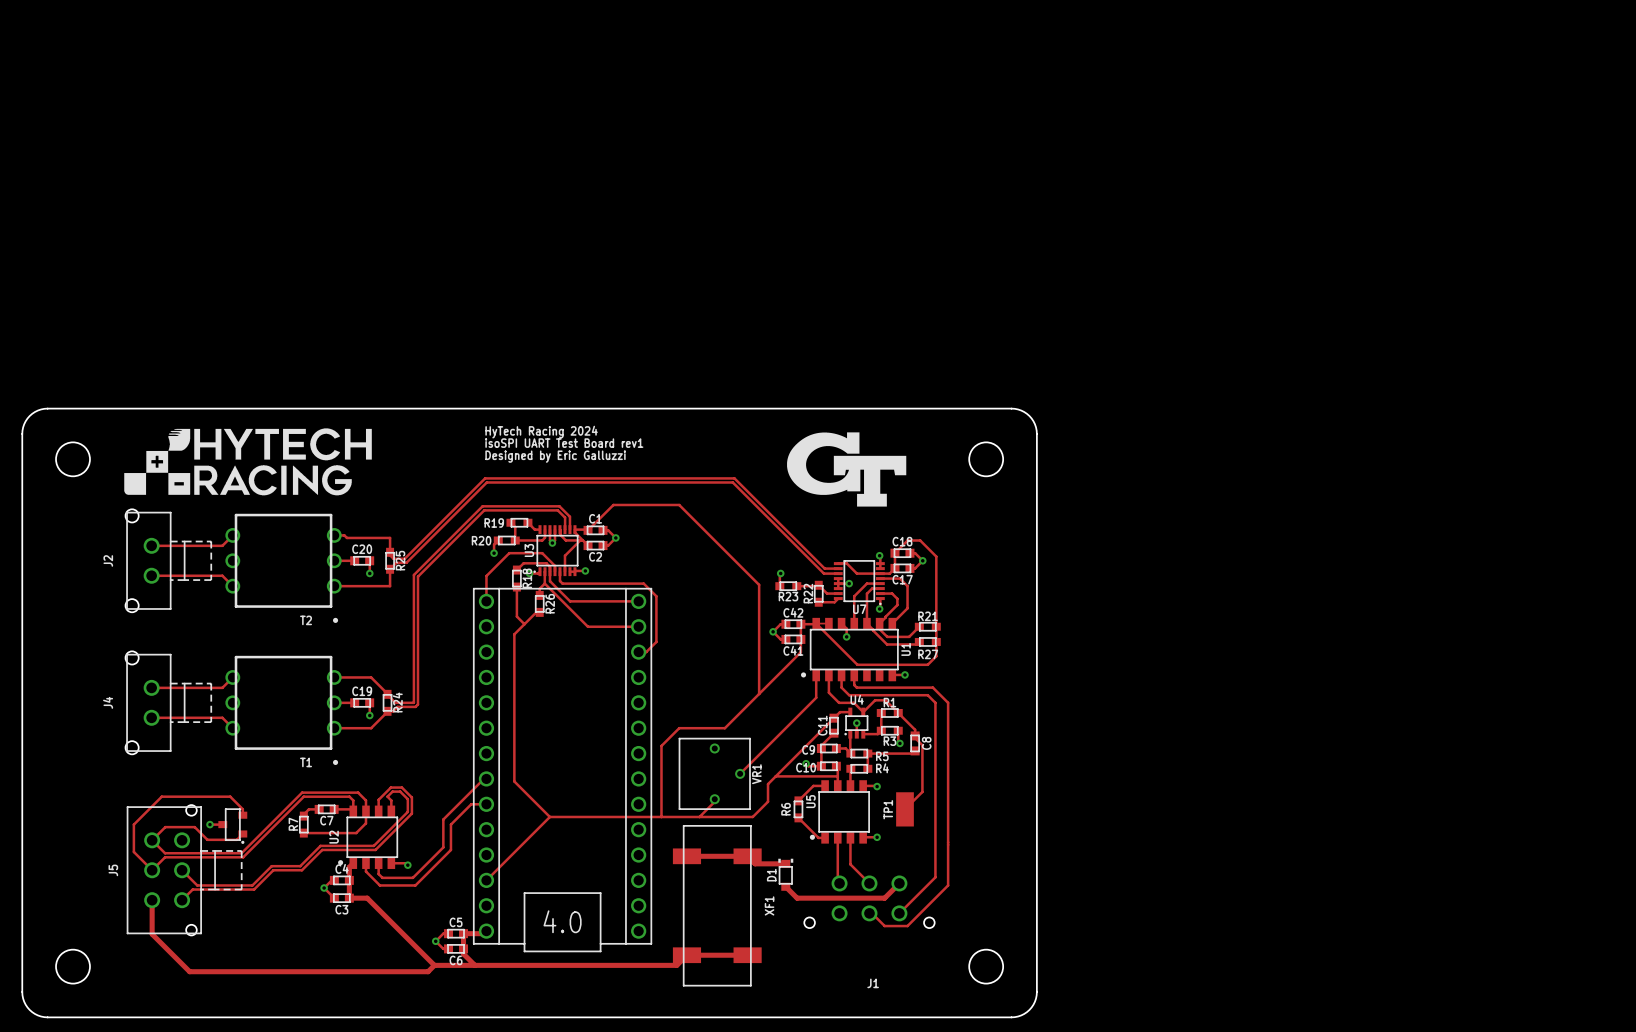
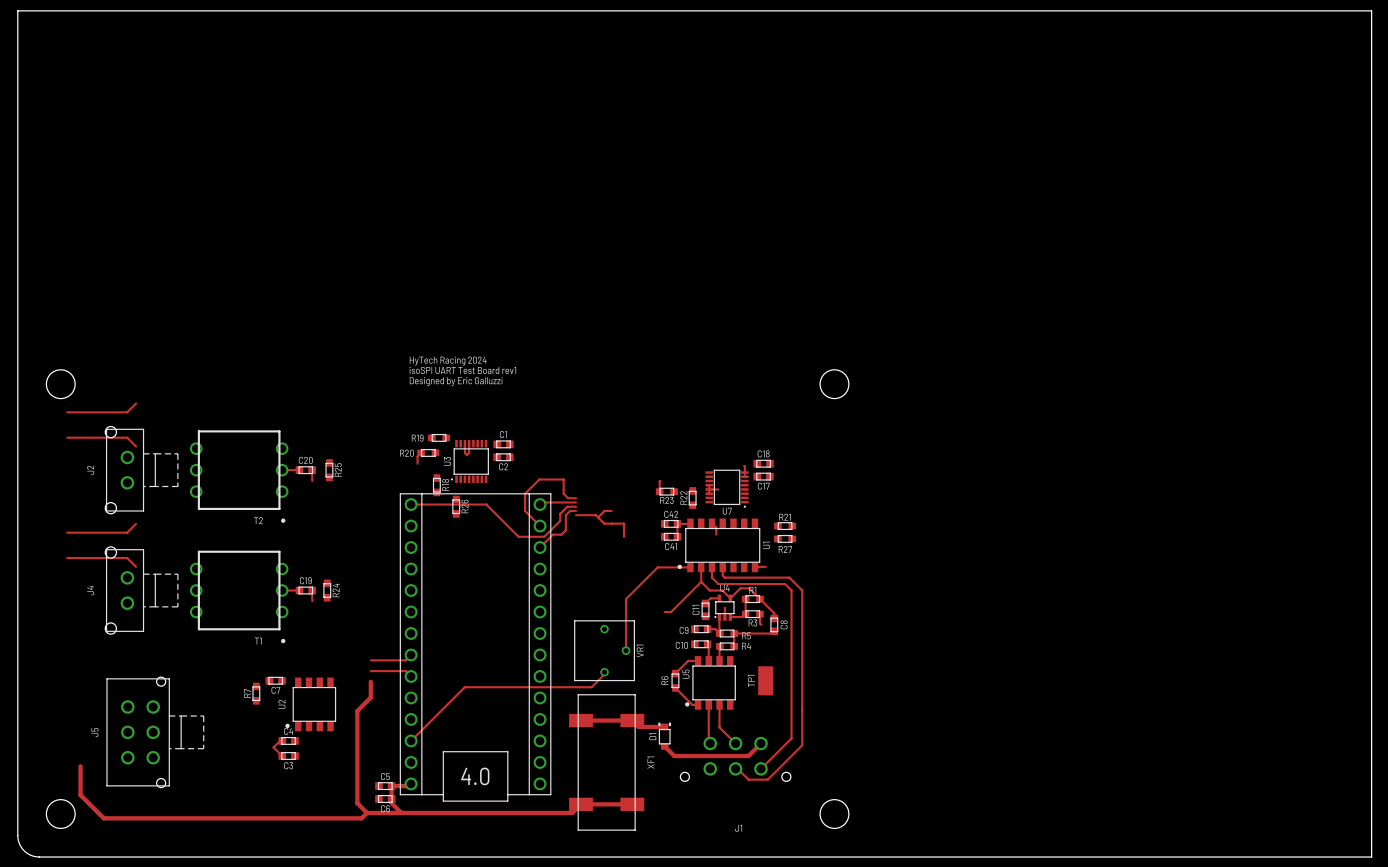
drawing: [124, 428, 372, 496] -> none
drawing: [787, 432, 907, 507] -> none
board edge: (22, 433) (24, 424) (29, 416) (37, 410) (47, 408) (1011, 408) (1024, 411) (1033, 421) (1036, 433) (1036, 992) (1034, 1001) (1029, 1009) (1021, 1015) (1011, 1017) -> (17, 362) (17, 10) (1371, 10) (1371, 857) (855, 857)
track: (510, 522) (515, 527) (515, 540) (542, 540) (545, 537) (545, 529) -> none
track: (527, 522) (534, 529) (540, 529) -> none
track: (559, 529) (560, 535) (565, 540) (582, 540) -> none
track: (565, 529) (565, 517) (557, 510) (484, 510) (417, 576) (417, 704) (415, 706) (397, 706) (393, 711) (387, 711) (371, 728) (334, 728) -> none
track: (569, 529) (569, 516) (559, 506) (482, 506) (413, 574) (413, 702) (395, 702) (371, 677) (334, 677) -> none
track: (603, 530) (608, 530) (615, 537) (608, 545) (603, 545) -> none
track: (232, 535) (222, 545) (151, 545) -> (136, 403) (127, 412) (67, 412)
track: (334, 535) (344, 535) (346, 537) (390, 537) (390, 555) (393, 558) (404, 558) (485, 478) (734, 478) (824, 568) (838, 568) -> none
via: (615, 537) -> none
track: (580, 540) (564, 555) (564, 571) -> none
via: (552, 543) -> none
track: (588, 545) (574, 532) (574, 529) (588, 530) (613, 504) (679, 504) (759, 584) (759, 693) -> none
via: (494, 553) -> none
track: (909, 553) (915, 553) (922, 560) (915, 568) (909, 568) -> none
via: (879, 555) -> none
via: (922, 560) -> none
track: (838, 563) (846, 563) (856, 573) (889, 573) (894, 568) (894, 553) (907, 540) (920, 540) (936, 556) (936, 656) (927, 664) (857, 664) (816, 623) (828, 623) -> none
track: (516, 570) (523, 563) (546, 563) (550, 566) (550, 581) (570, 601) -> none
track: (585, 570) (569, 571) -> none
via: (585, 570) -> none
track: (540, 571) (529, 573) -> none
track: (545, 571) (544, 583) -> none
track: (554, 571) (554, 565) (542, 553) (509, 553) (486, 576) (486, 601) -> (482, 504) (411, 504)
track: (559, 571) (559, 581) (562, 583) (643, 583) (656, 596) (656, 641) (646, 652) (638, 652) -> (575, 510) (570, 510) (565, 515) (565, 530) (561, 534) (552, 534) (540, 547)
via: (369, 573) -> none
via: (529, 573) -> none
via: (780, 573) -> none
track: (838, 573) (823, 573) (732, 482) (486, 482) (406, 562) (396, 562) (390, 569) (390, 586) (334, 586) -> none
track: (151, 575) (222, 575) (232, 586) -> (67, 437) (127, 437) (136, 446)
track: (880, 578) (899, 578) (907, 586) (907, 608) (892, 623) -> none
track: (544, 583) (587, 626) (638, 626) -> (575, 498) (568, 498) (563, 493) (563, 479) (539, 479) (525, 493) (525, 510) (540, 526)
track: (544, 583) (539, 588) (539, 595) -> none
via: (849, 583) -> none
track: (880, 583) (866, 583) (854, 596) (854, 623) -> none
track: (796, 586) (818, 585) (827, 593) (838, 593) -> none
track: (516, 587) (516, 616) (524, 624) -> none
track: (880, 588) (872, 588) (866, 593) (866, 623) (887, 644) (916, 644) (919, 641) -> none
track: (880, 593) (892, 593) (897, 598) (897, 605) (879, 623) (879, 629) (887, 636) (909, 636) (919, 626) -> none
track: none -> (575, 502) (542, 502) (540, 504)
track: (838, 598) (834, 602) (818, 602) -> none
track: (880, 598) (879, 608) -> none
track: (575, 601) (638, 601) -> (486, 504) (518, 536) (544, 536) (560, 520) (560, 513) (567, 506) (575, 506)
track: none -> (611, 510) (604, 510) (598, 517)
via: (879, 608) -> none
track: (539, 612) (536, 612) (514, 634) (514, 781) (549, 816) -> none
track: none -> (575, 515) (595, 515) (604, 523) (623, 523) (623, 536)
track: (785, 624) (780, 624) (773, 631) (780, 639) (785, 639) -> none
via: (773, 631) -> none
via: (846, 636) -> none
track: (800, 639) (800, 652) (777, 675) -> (690, 567) (657, 567)
via: (904, 674) -> none
track: (816, 675) (816, 697) (740, 773) -> (626, 599) (626, 650)
track: (232, 677) (222, 687) (151, 687) -> (136, 523) (127, 532) (67, 532)
track: none -> (701, 581) (671, 612) (664, 612)
track: (740, 712) (724, 728) (679, 728) (661, 745) (661, 816) -> none
via: (369, 715) -> none
track: (151, 717) (222, 717) (232, 728) -> (67, 558) (127, 558) (136, 566)
track: (833, 718) (768, 784) (768, 801) (752, 816) (699, 816) -> none
via: (856, 723) -> none
track: (833, 733) (821, 745) (821, 766) (808, 766) (806, 763) -> none
track: (915, 735) (922, 745) (922, 791) (904, 809) -> none
via: (899, 743) -> none
via: (806, 763) -> none
track: (775, 776) (837, 776) -> none
track: (486, 778) (483, 778) (443, 819) (443, 847) (412, 877) (382, 877) (378, 874) (378, 863) -> (411, 654) (405, 660) (370, 660)
track: (863, 785) (877, 786) -> none
via: (877, 786) -> none
track: (486, 804) (471, 804) (450, 824) (450, 849) (415, 885) (379, 885) (365, 871) (365, 863) -> (411, 676) (405, 671) (370, 671)
track: (319, 809) (308, 809) (303, 816) -> none
track: (334, 809) (351, 809) (353, 811) (353, 800) (349, 796) (303, 796) (243, 857) (165, 857) (152, 870) (133, 851) (133, 824) (161, 796) (230, 796) (242, 809) (242, 815) -> none
track: (378, 811) (378, 799) (390, 787) (401, 787) (411, 797) (411, 813) (375, 849) (322, 849) (301, 870) (273, 870) (254, 889) (192, 889) (182, 900) -> none
track: (391, 811) (391, 800) (387, 796) (392, 791) (400, 791) (407, 799) (407, 811) (373, 845) (320, 845) (300, 866) (271, 866) (252, 885) (197, 885) (182, 870) -> none
track: (209, 824) (222, 824) -> none
via: (209, 824) -> none
part: (232, 826) -> none
track: (303, 833) (356, 833) (365, 823) (365, 800) (358, 792) (302, 792) (241, 853) (165, 853) (152, 840) (165, 827) (194, 827) (207, 839) (236, 839) (242, 833) -> none
track: (877, 837) (863, 837) -> none
via: (877, 837) -> none
track: (353, 863) (349, 867) (349, 898) (367, 898) (423, 953) -> (370, 681) (370, 697) (357, 710) (357, 803)
track: (391, 863) (405, 863) (407, 865) -> none
via: (407, 865) -> none
via: (324, 888) -> none
track: (152, 900) (152, 934) (189, 971) -> (80, 766) (80, 795) (103, 818) (159, 818)
track: (448, 933) (443, 933) (435, 941) (443, 948) (448, 948) -> none
via: (435, 941) -> none

